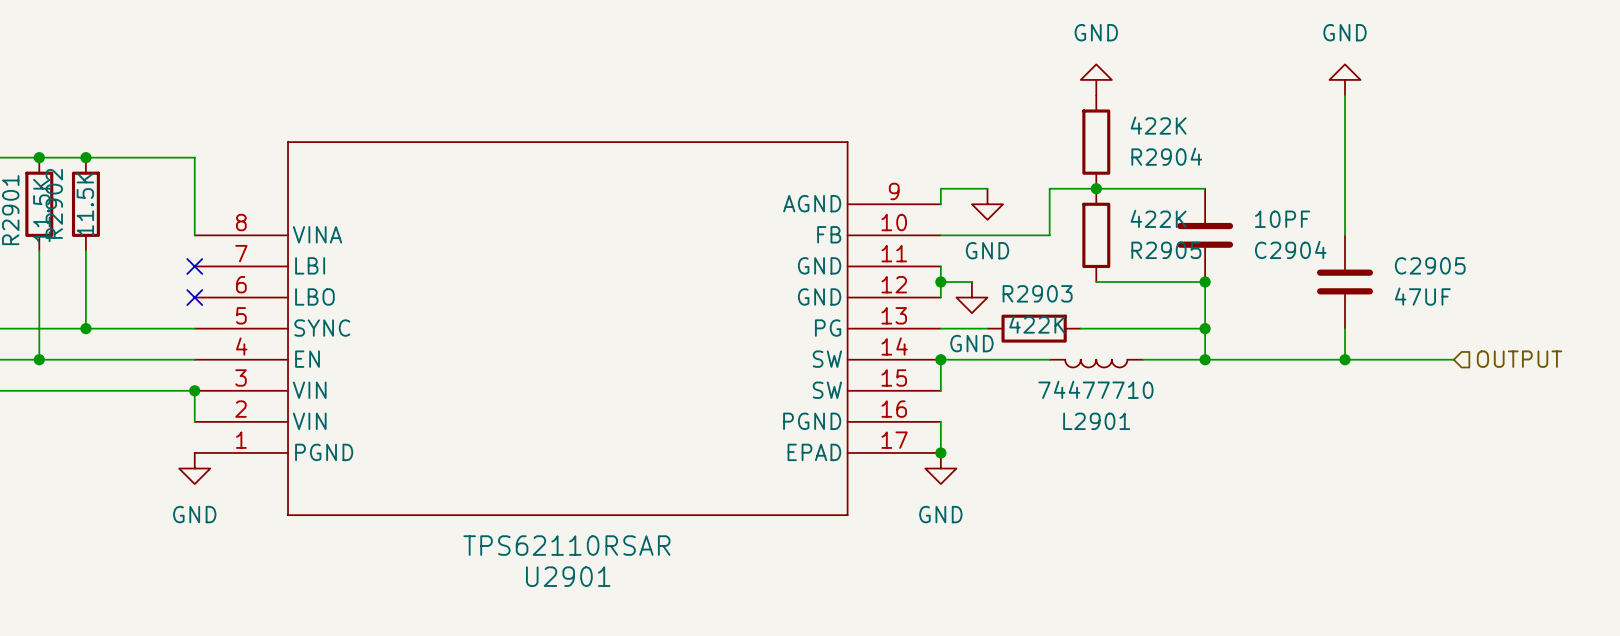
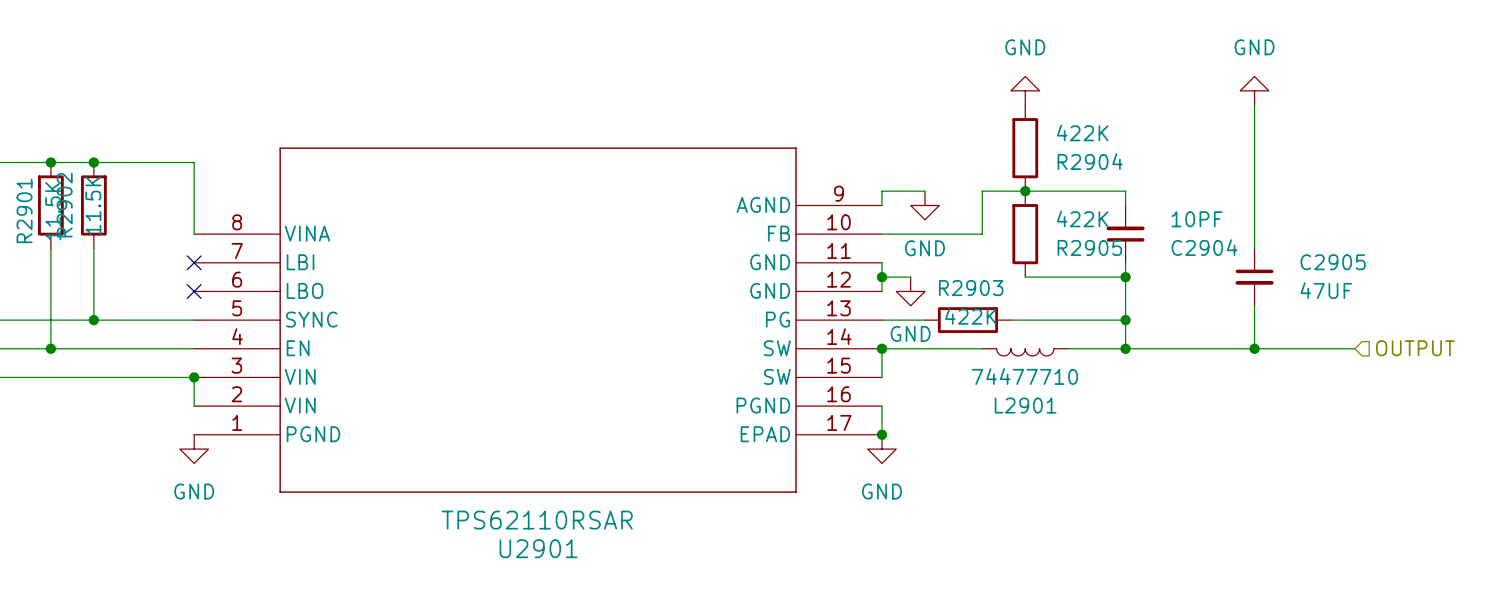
C2904 symbol: [1177, 188, 1234, 283] -> [1106, 205, 1145, 263]
C2905 symbol: [1317, 235, 1373, 329] -> [1235, 248, 1274, 306]

